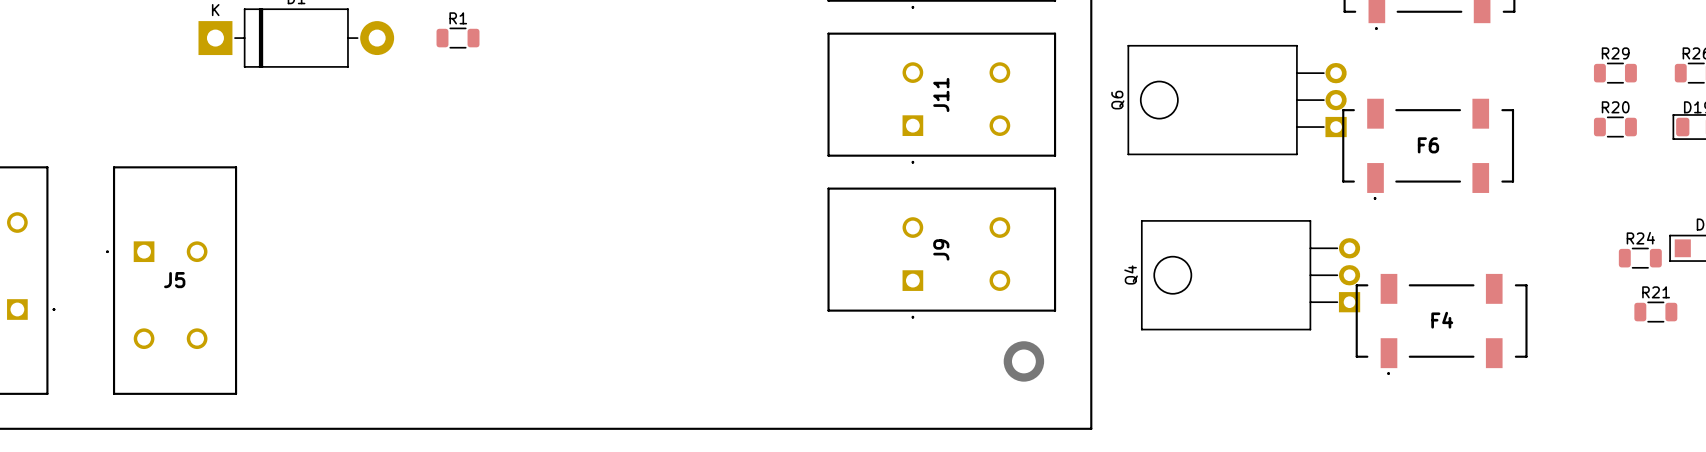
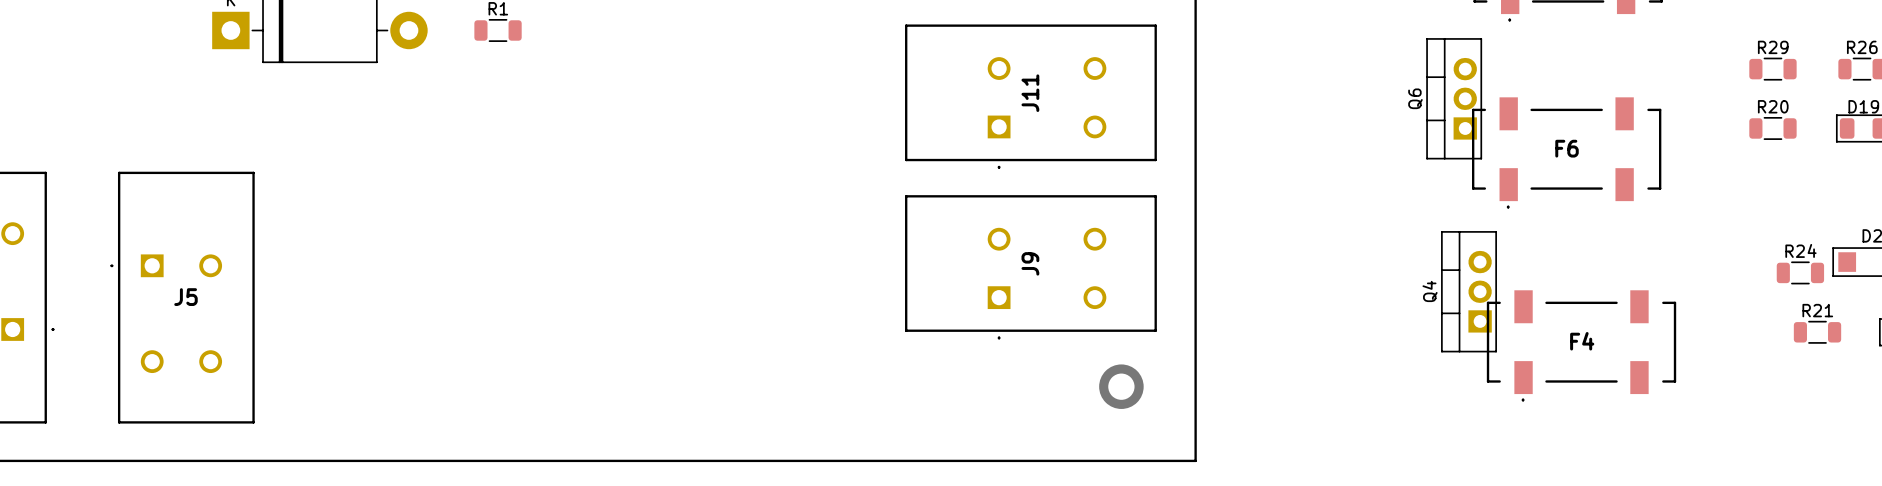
Q6 footprint: [1127, 45, 1347, 156] -> [1426, 38, 1482, 160]
Q6 name position: Q6 (1117, 100) -> Q6 (1415, 98)
Q4 footprint: [1141, 220, 1361, 331] -> [1441, 231, 1497, 353]
Q4 name position: Q4 (1131, 274) -> Q4 (1430, 291)

